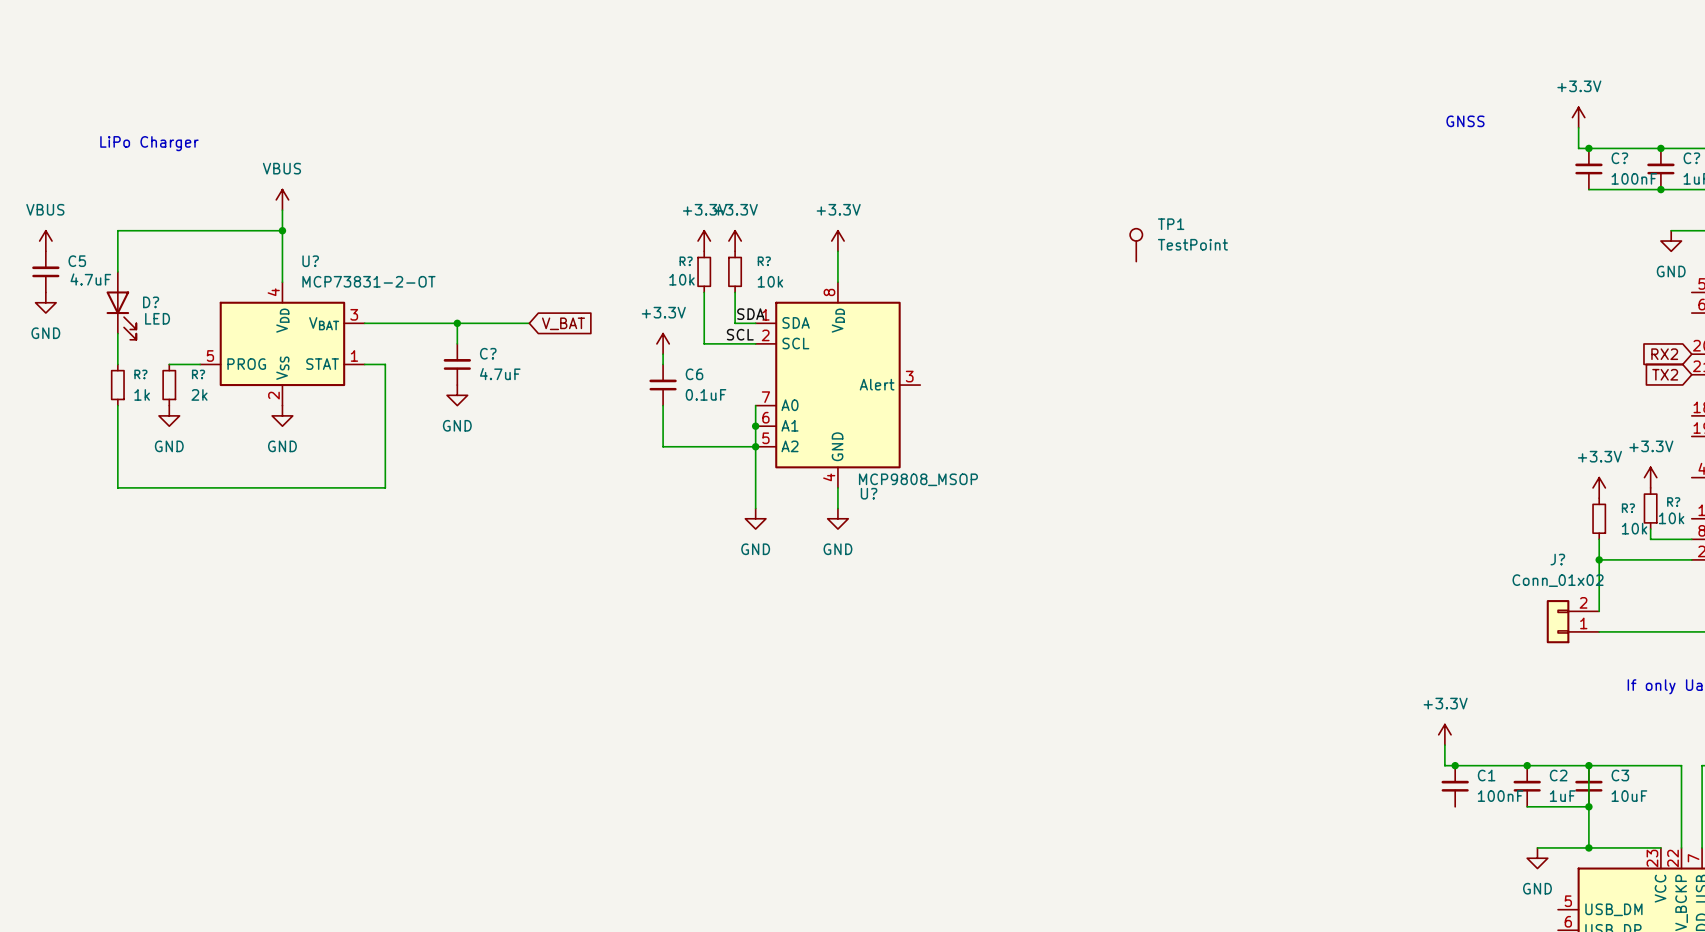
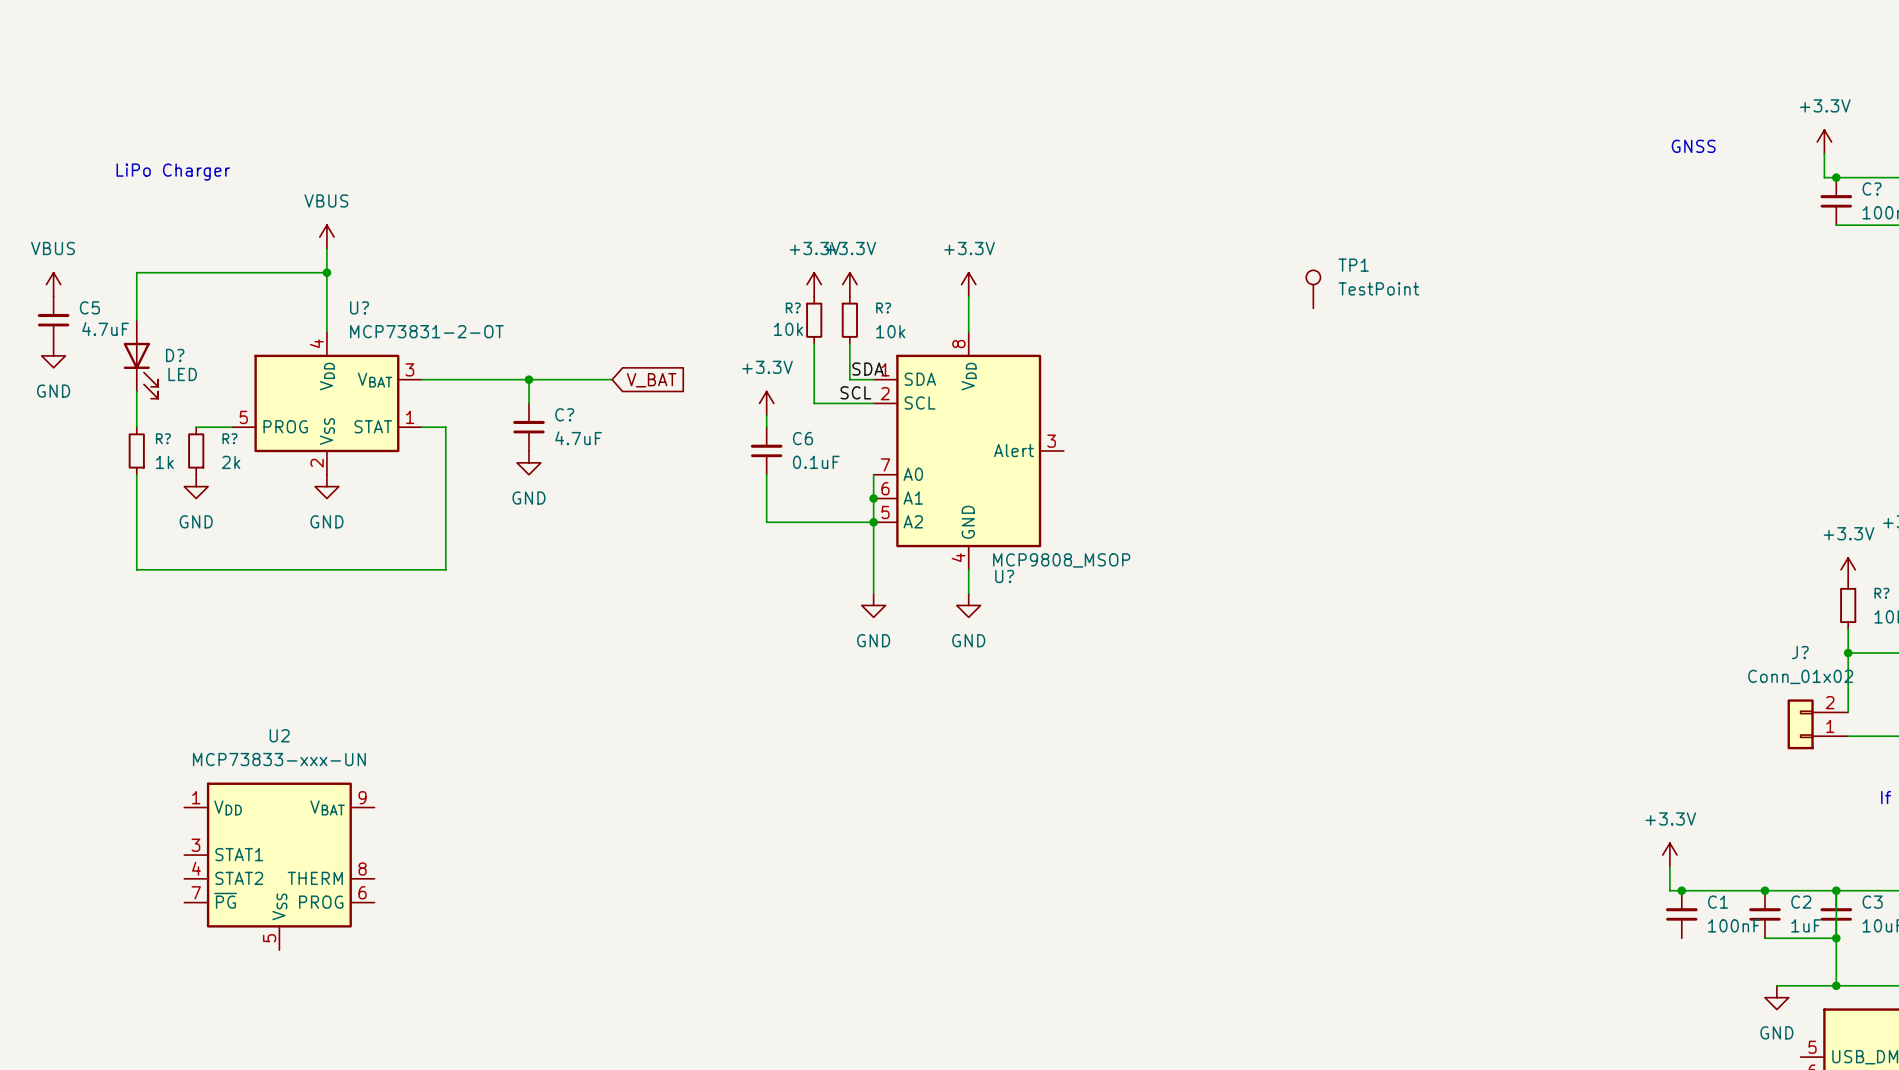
U2: none -> MCP73833-xxx-UN (279, 866)

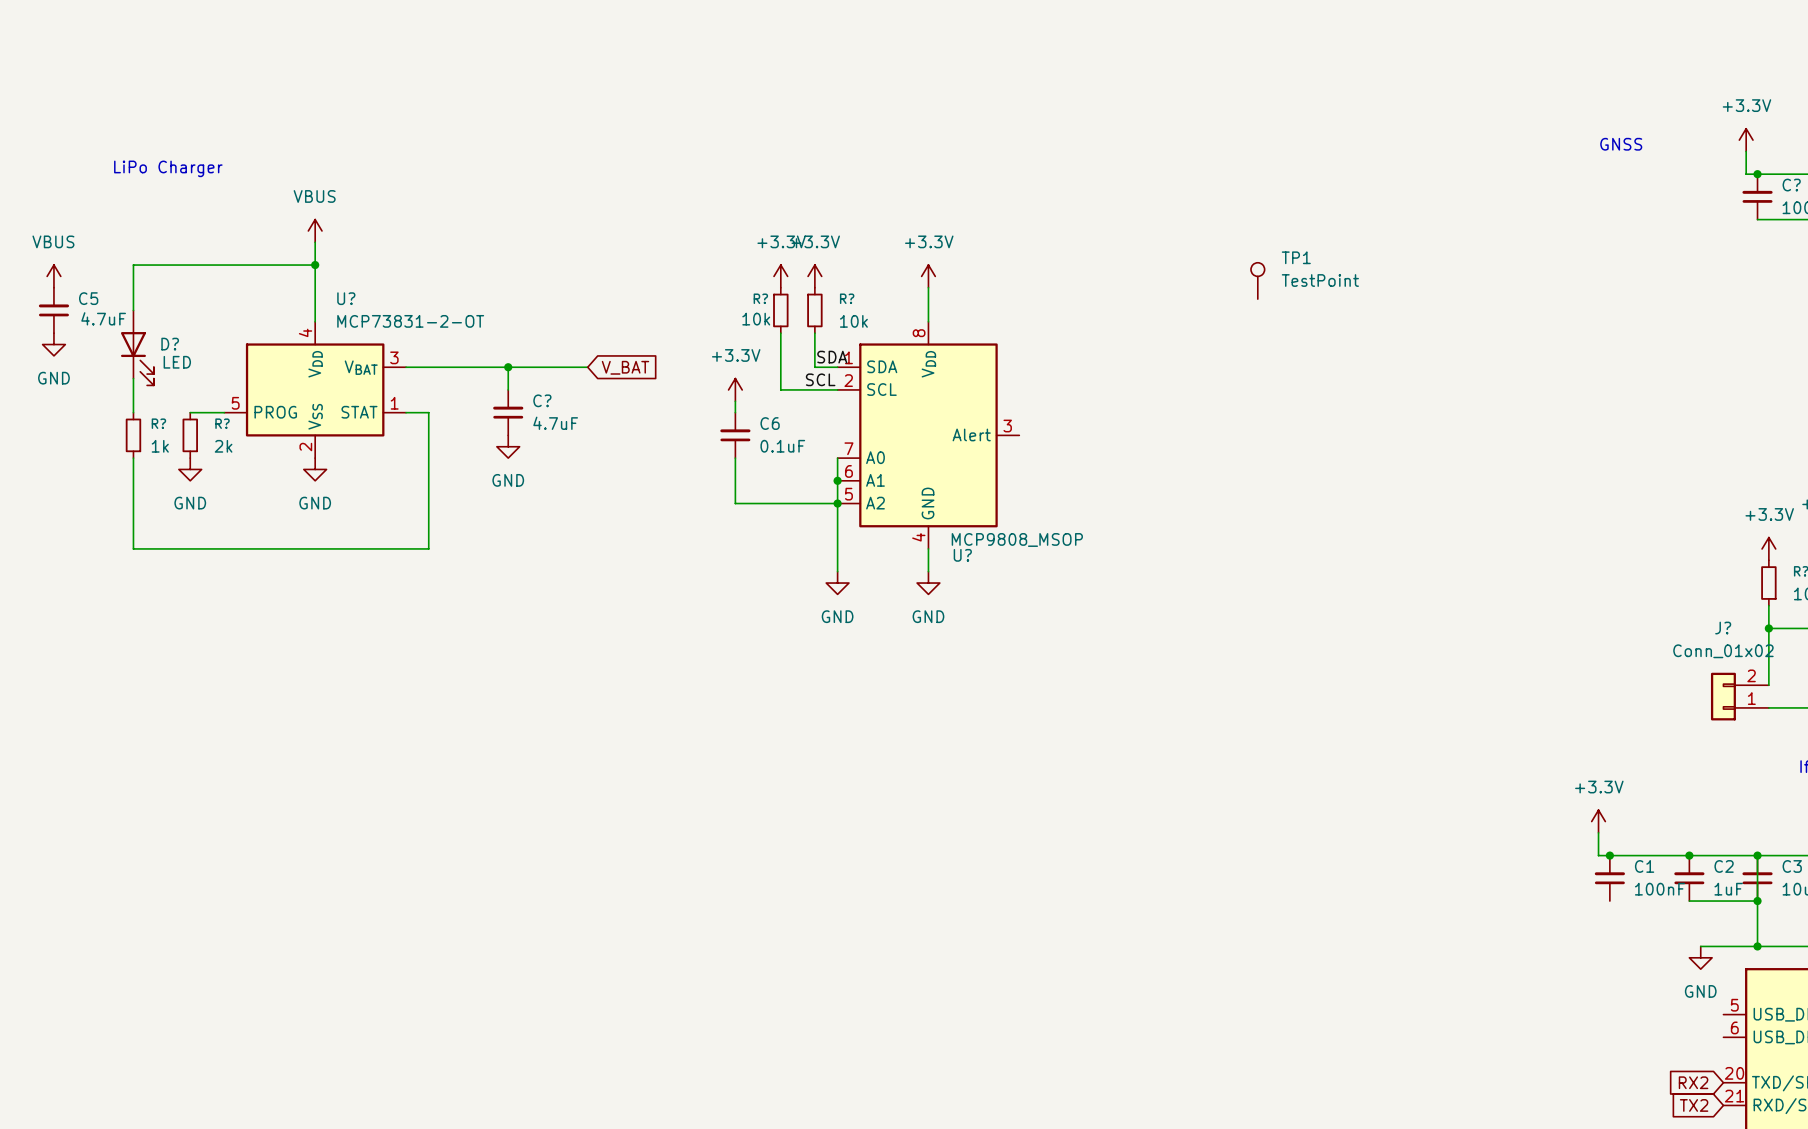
U2: MCP73833-xxx-UN (279, 866) -> none

